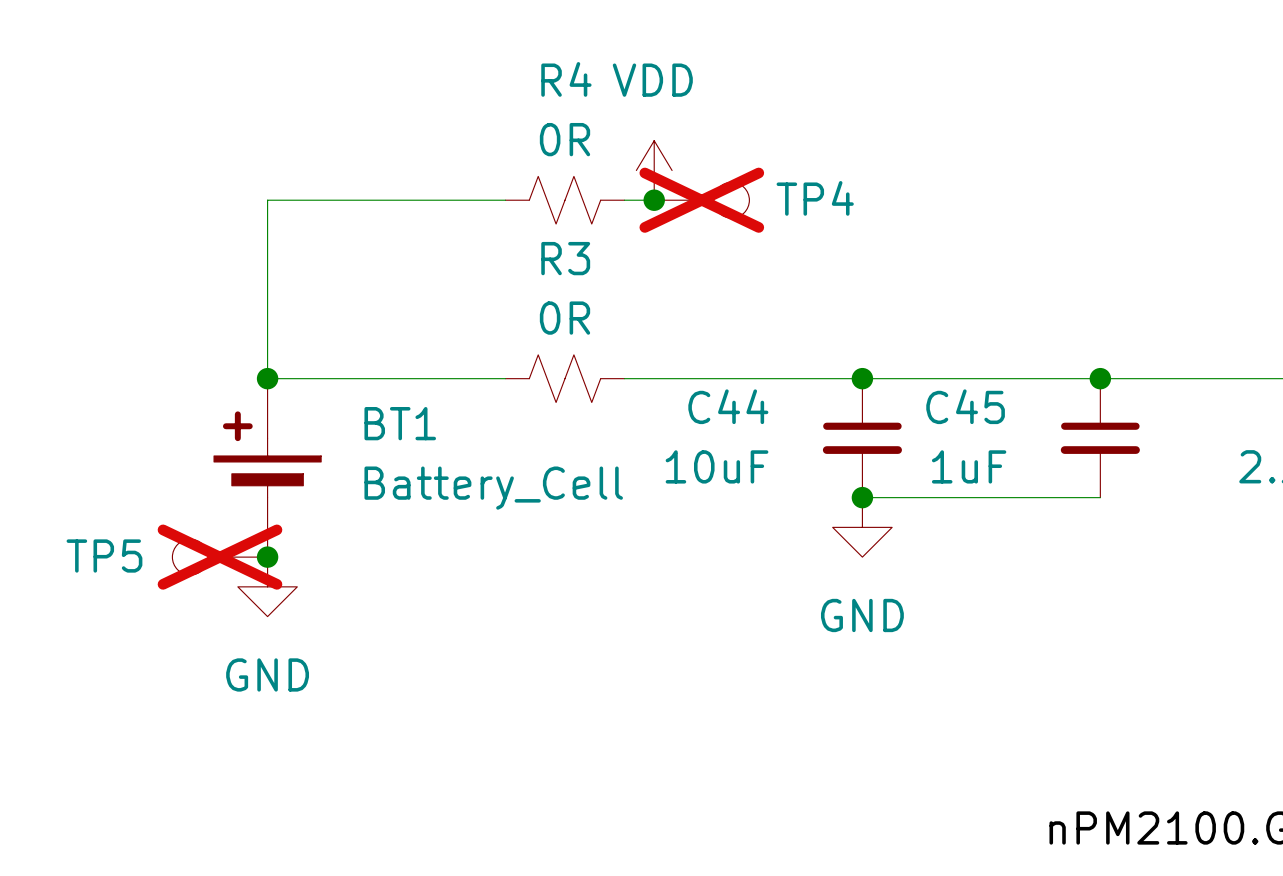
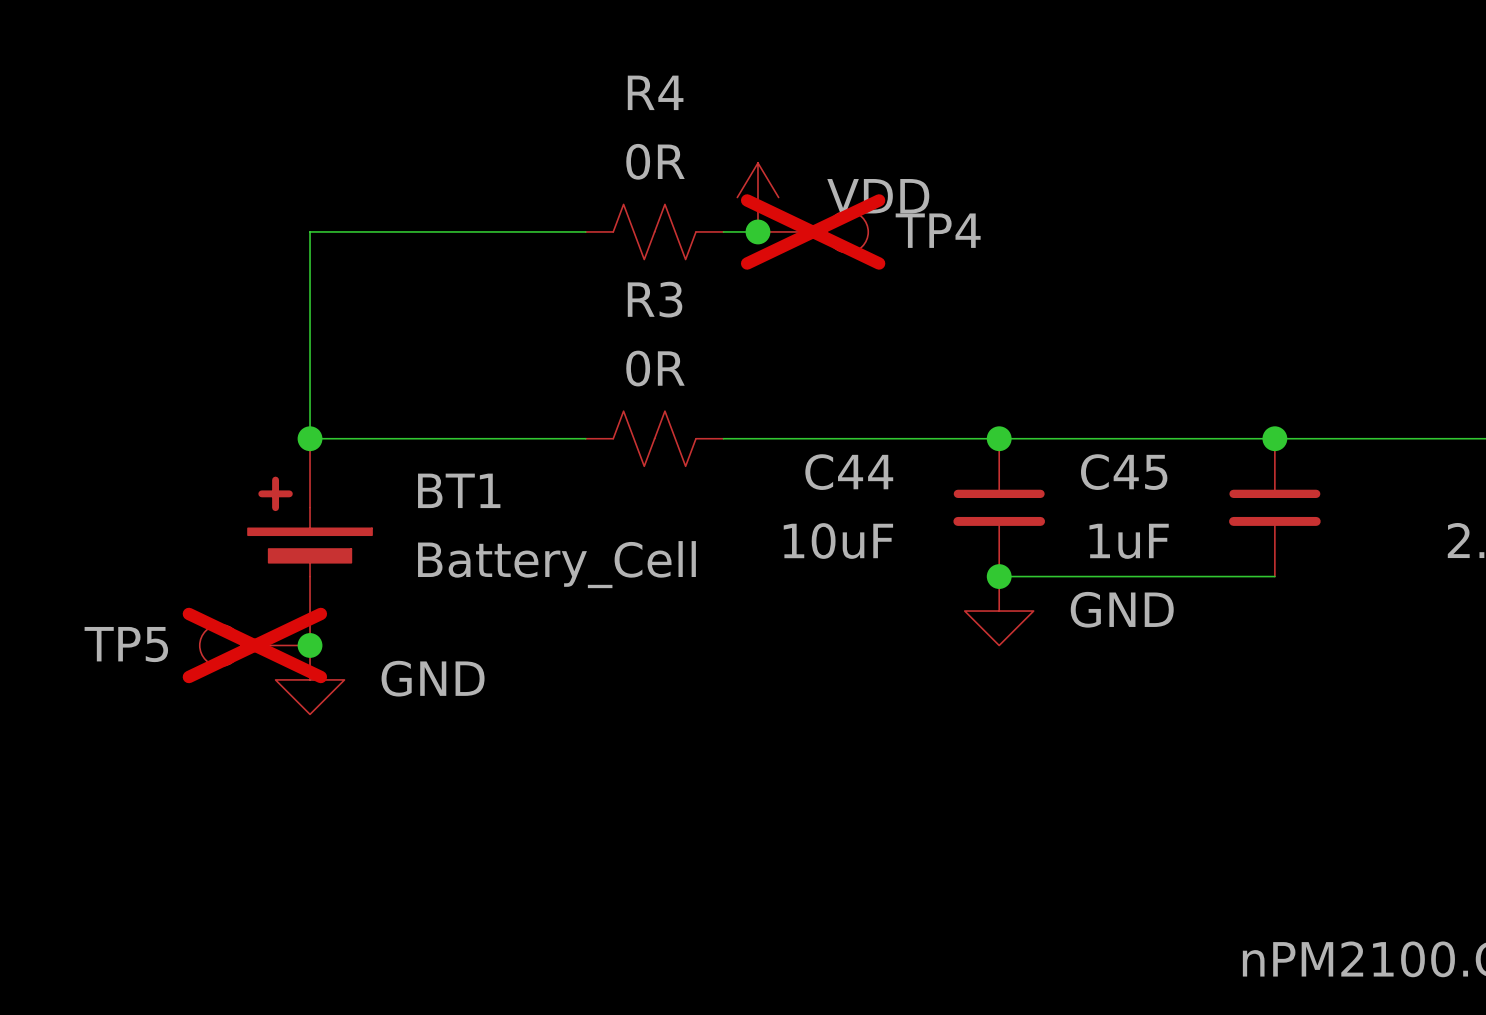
power symbol text position: VDD (652, 80) -> VDD (878, 196)
power symbol text position: GND (862, 615) -> GND (1122, 609)
power symbol text position: GND (267, 674) -> GND (433, 678)

